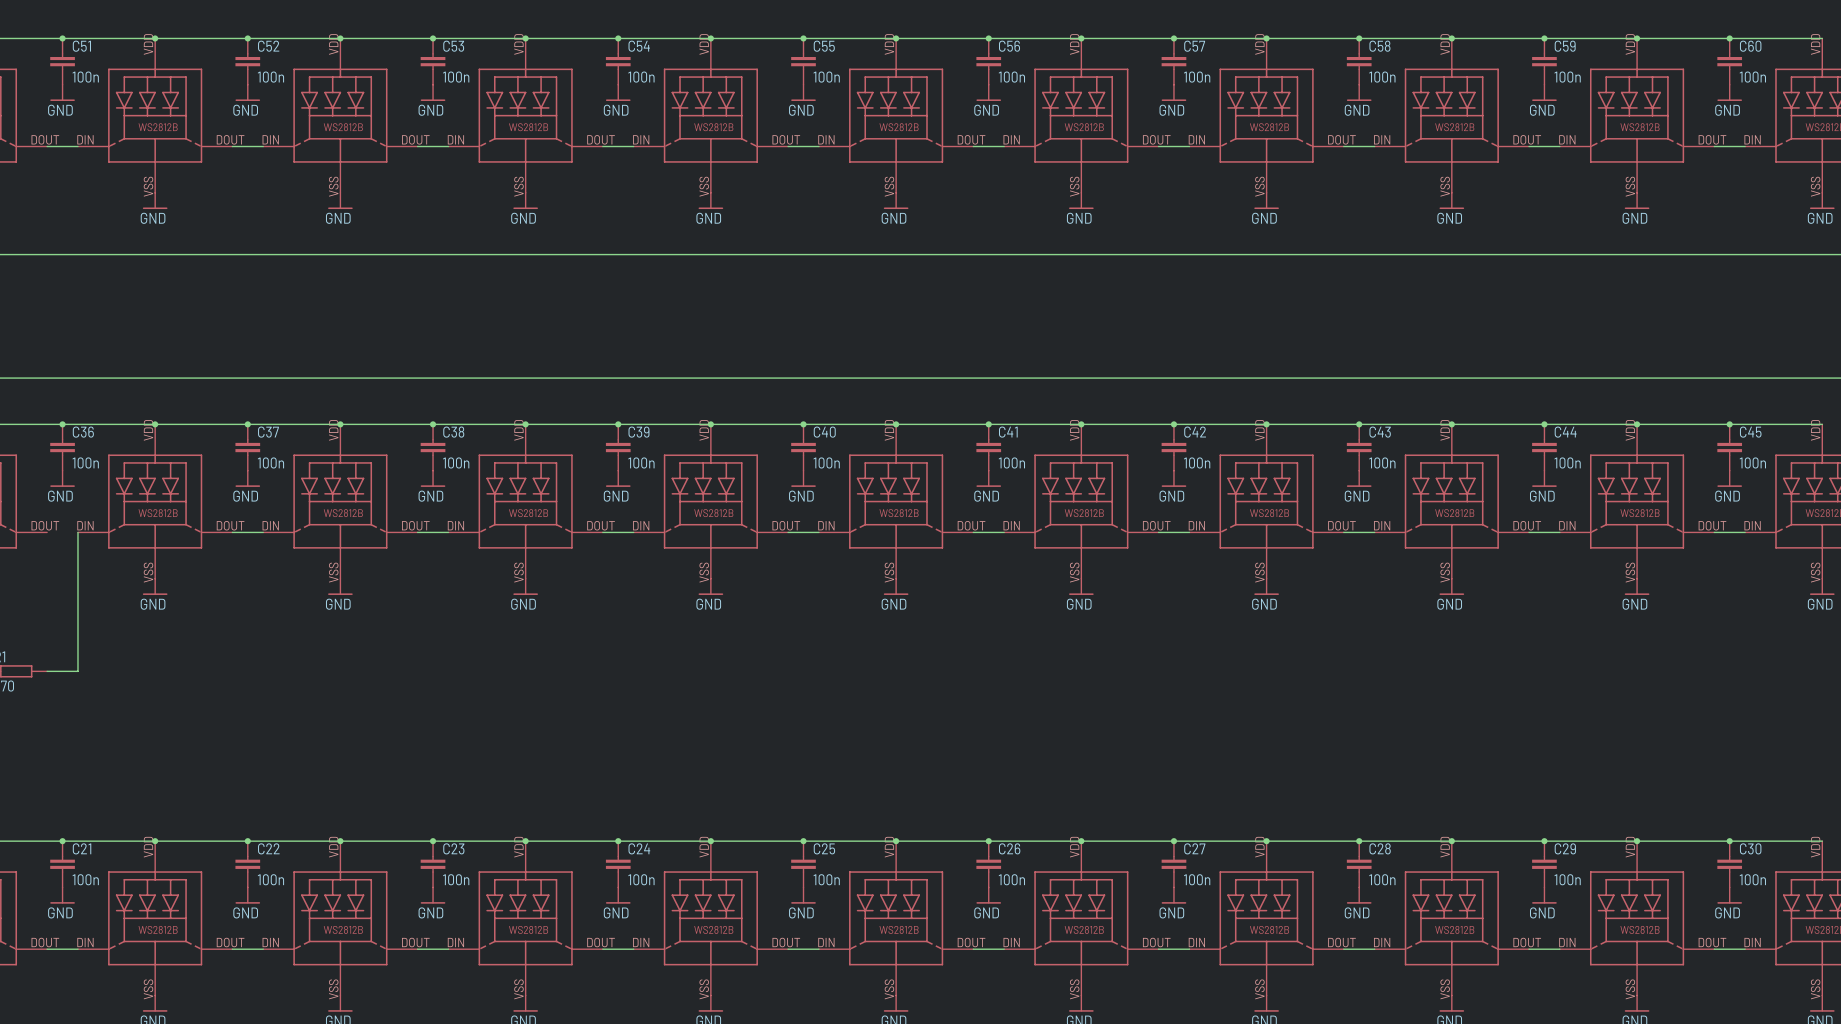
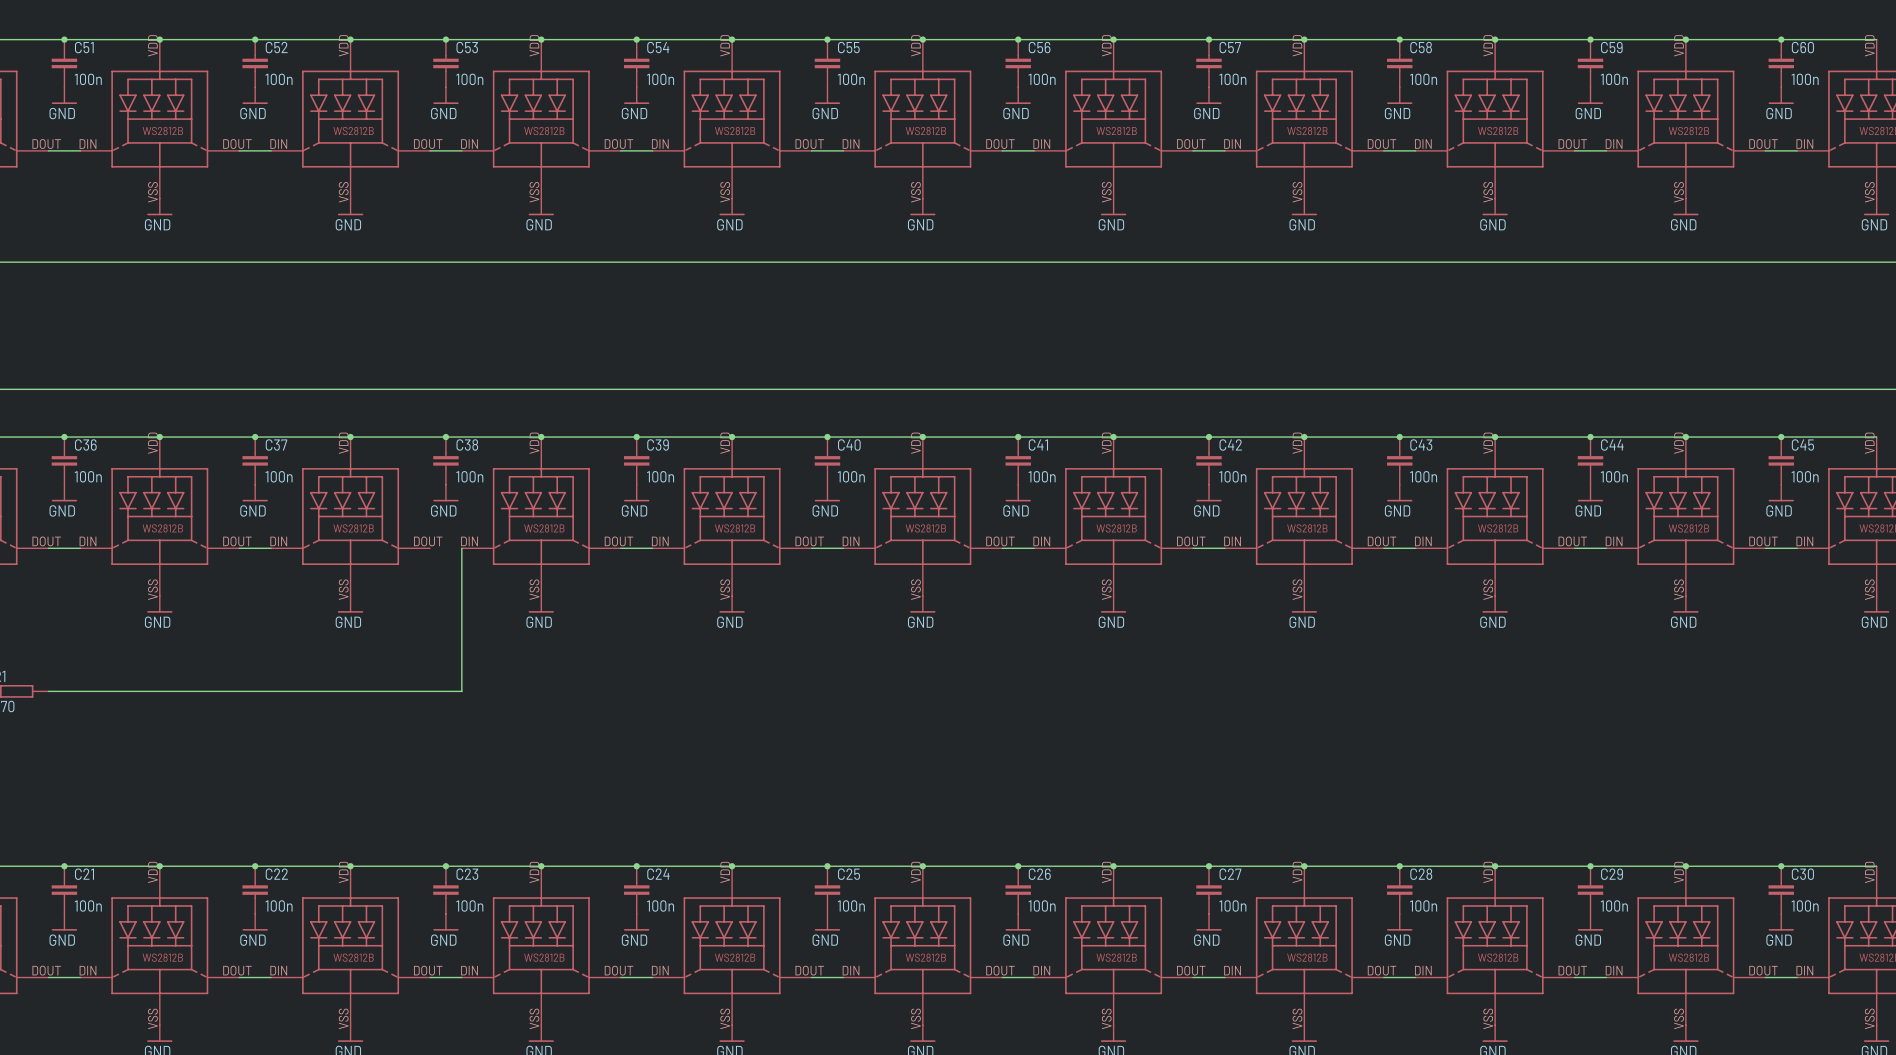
wire: (77, 532) (77, 671) -> (80, 548) (48, 548)
wire: (417, 532) (448, 532) -> (80, 691) (461, 691) (461, 548)

